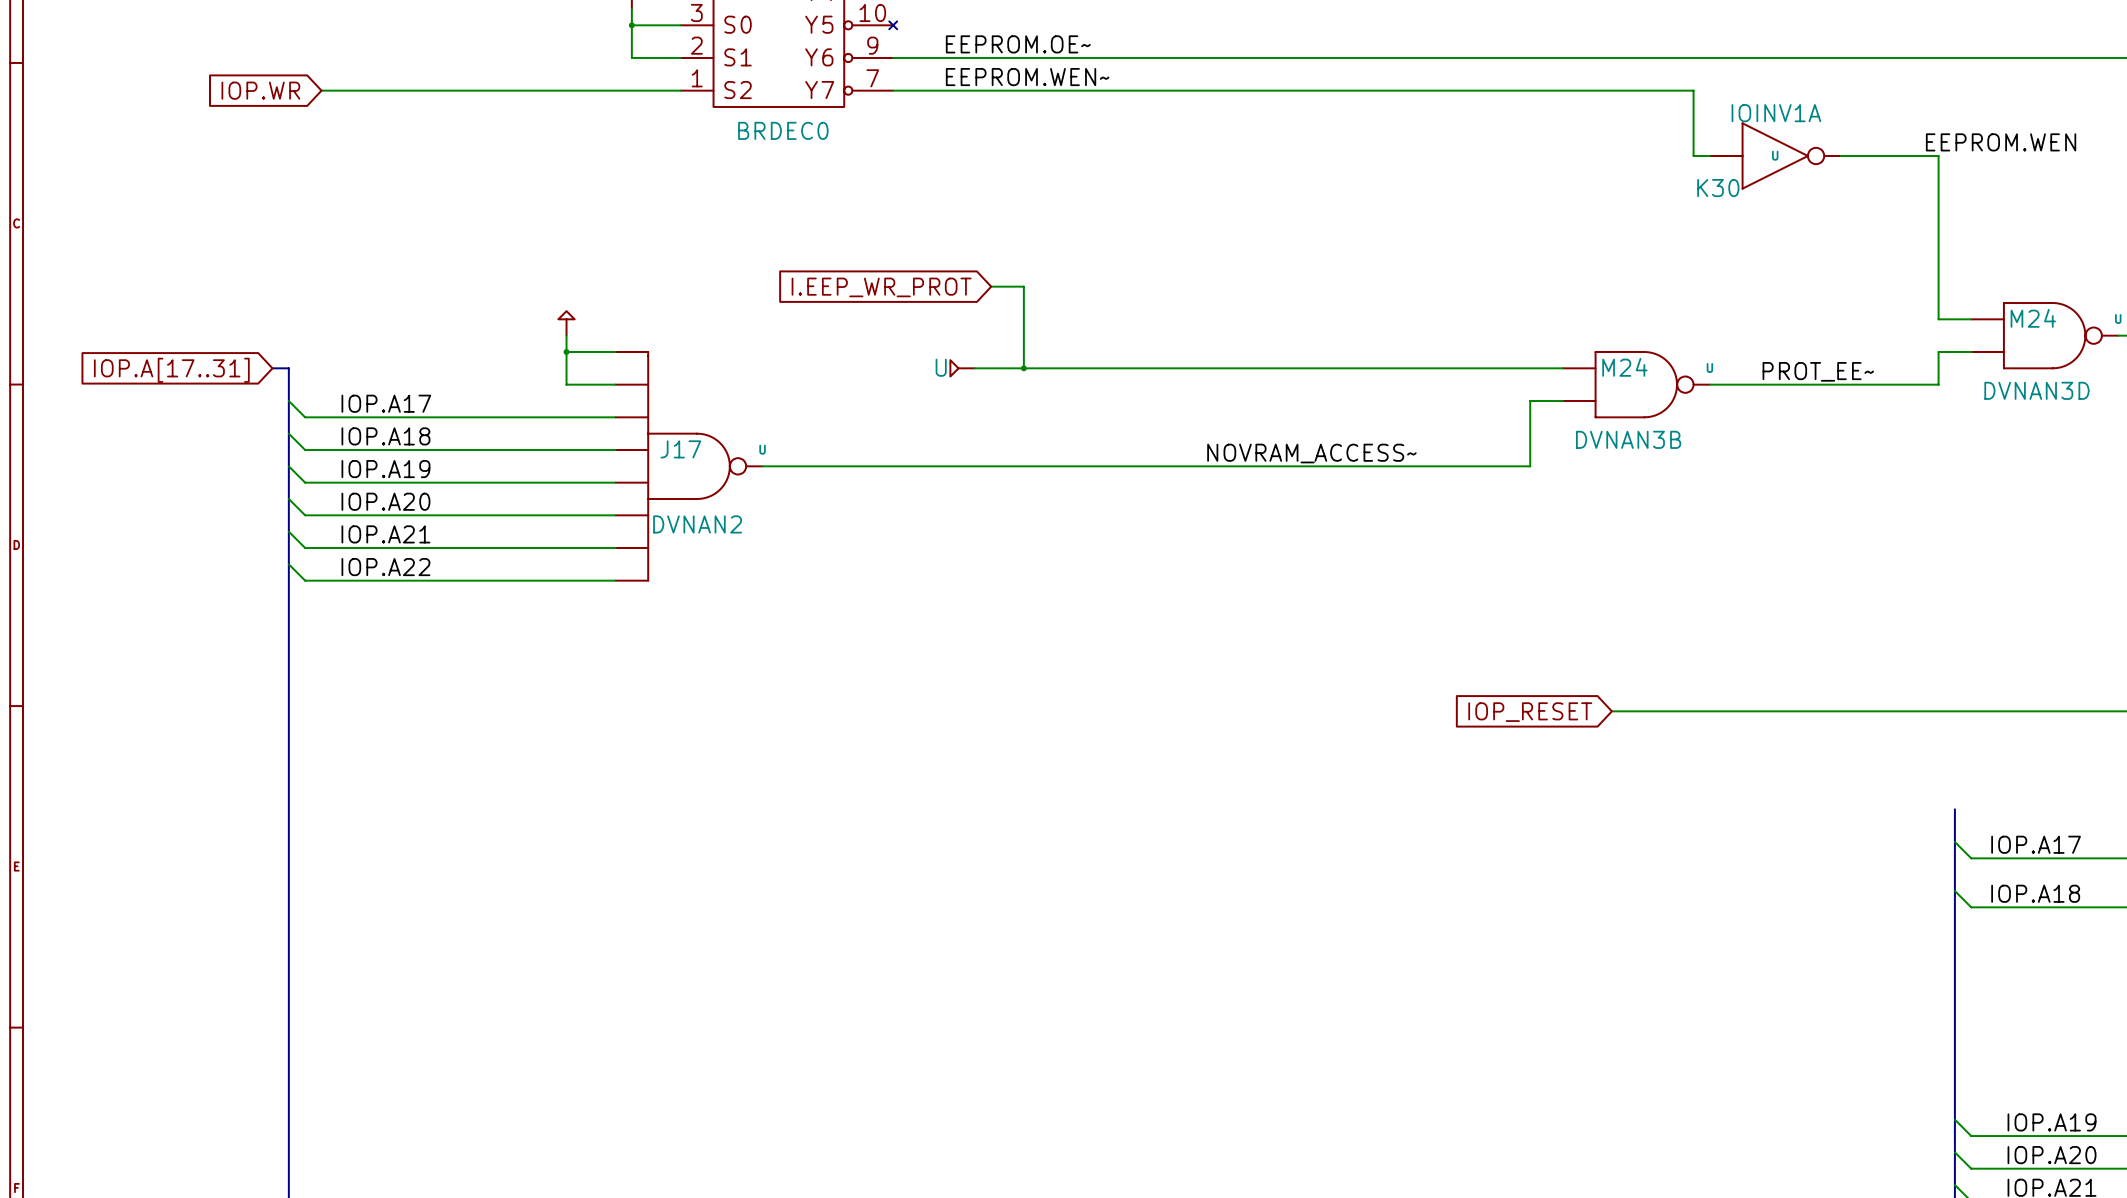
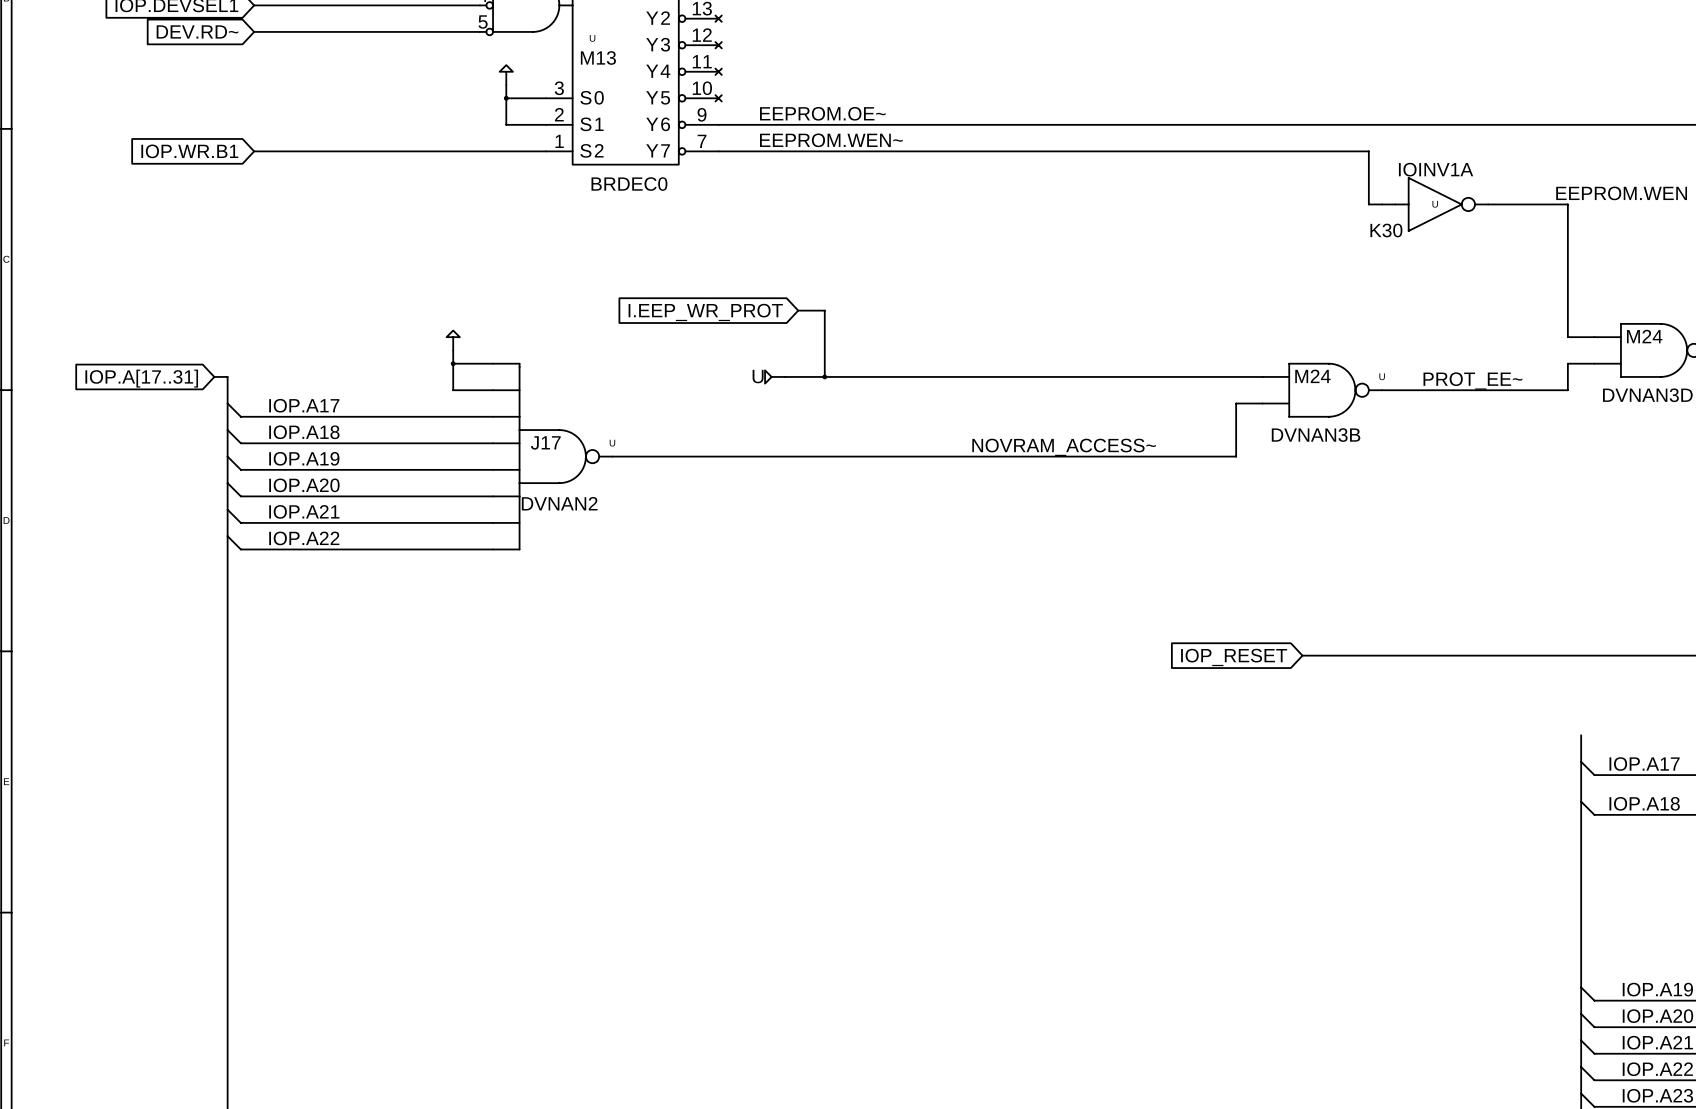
global label: IOP.WR (260, 90) -> IOP.WR.B1 (189, 151)

